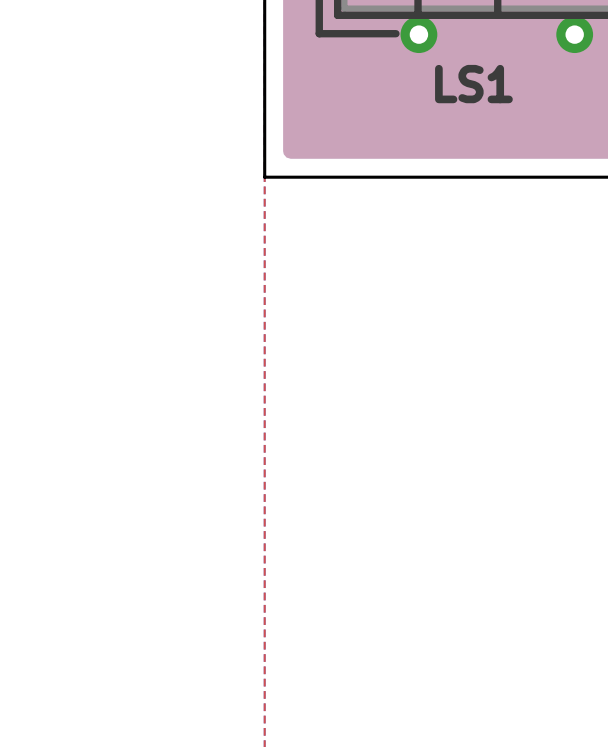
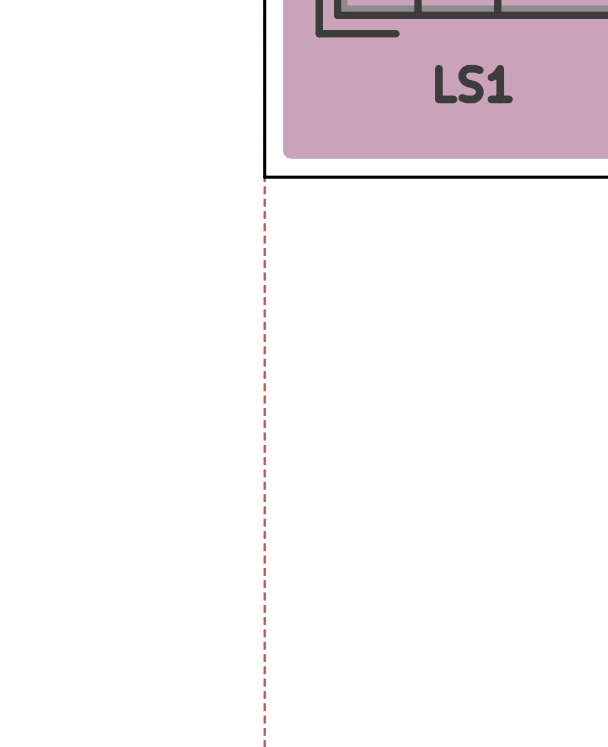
via: (418, 34) -> none
via: (574, 34) -> none

